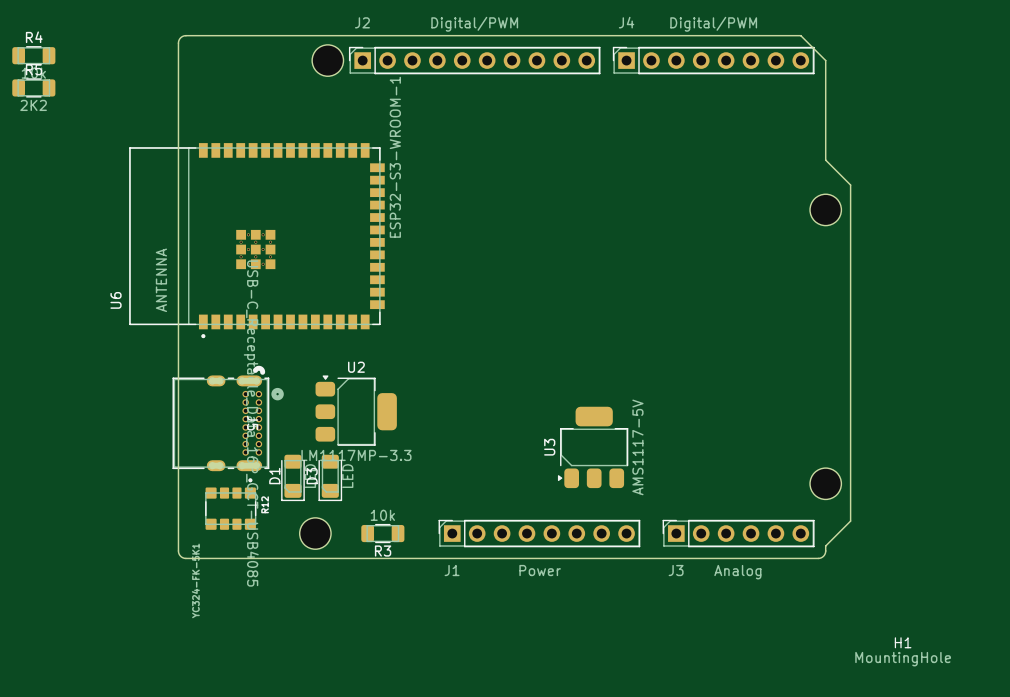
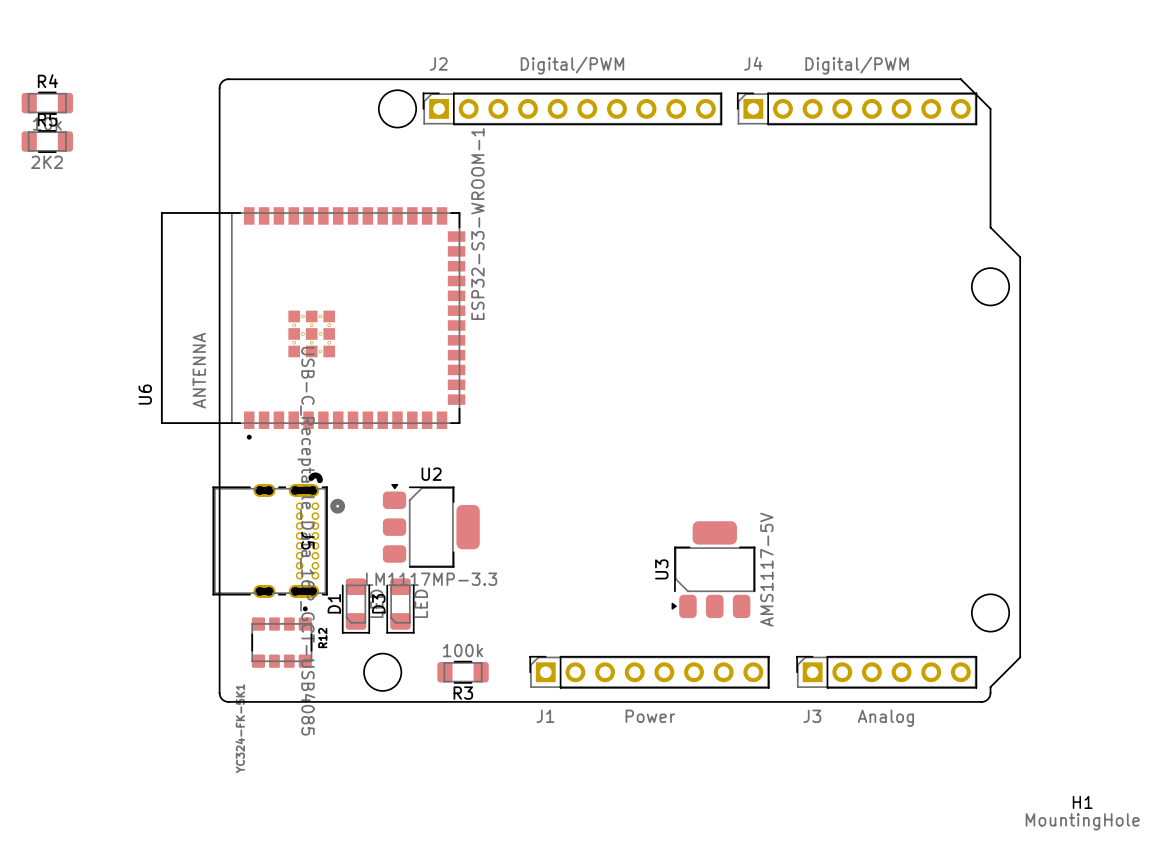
R3 value: 10k (382, 515) -> 100k (463, 650)

